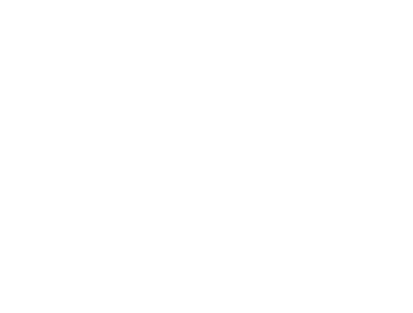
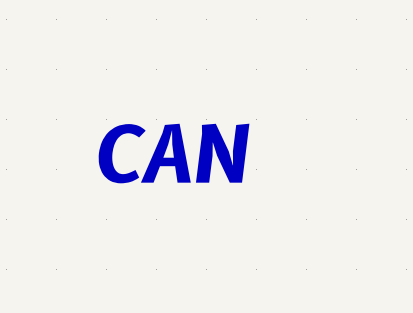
text: none -> CAN (173, 153)

